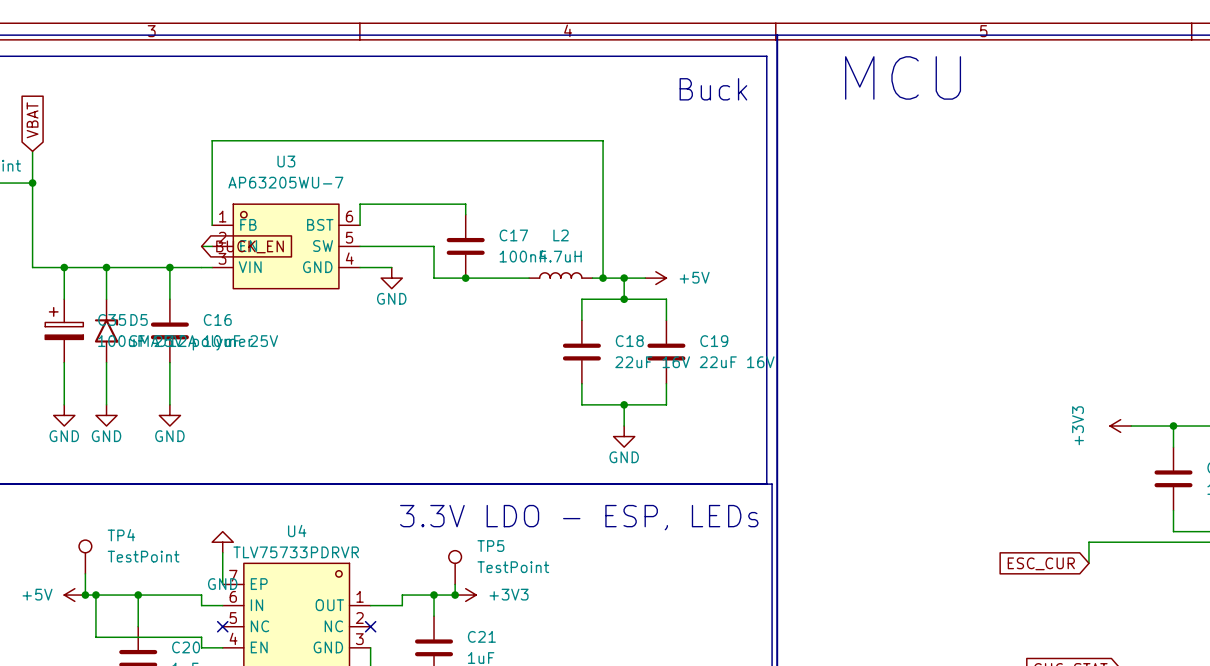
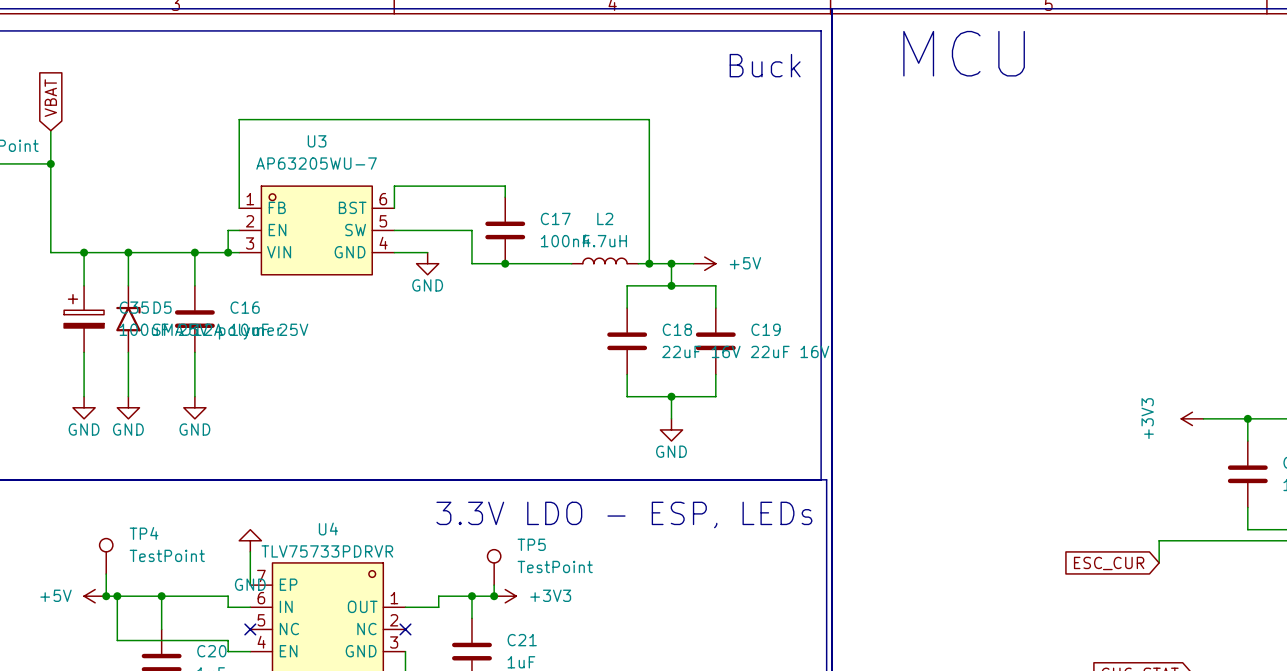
wire: none -> (228, 230) (228, 252)
global label: BUCK_EN (250, 246) -> none
junction: none -> (228, 252)

